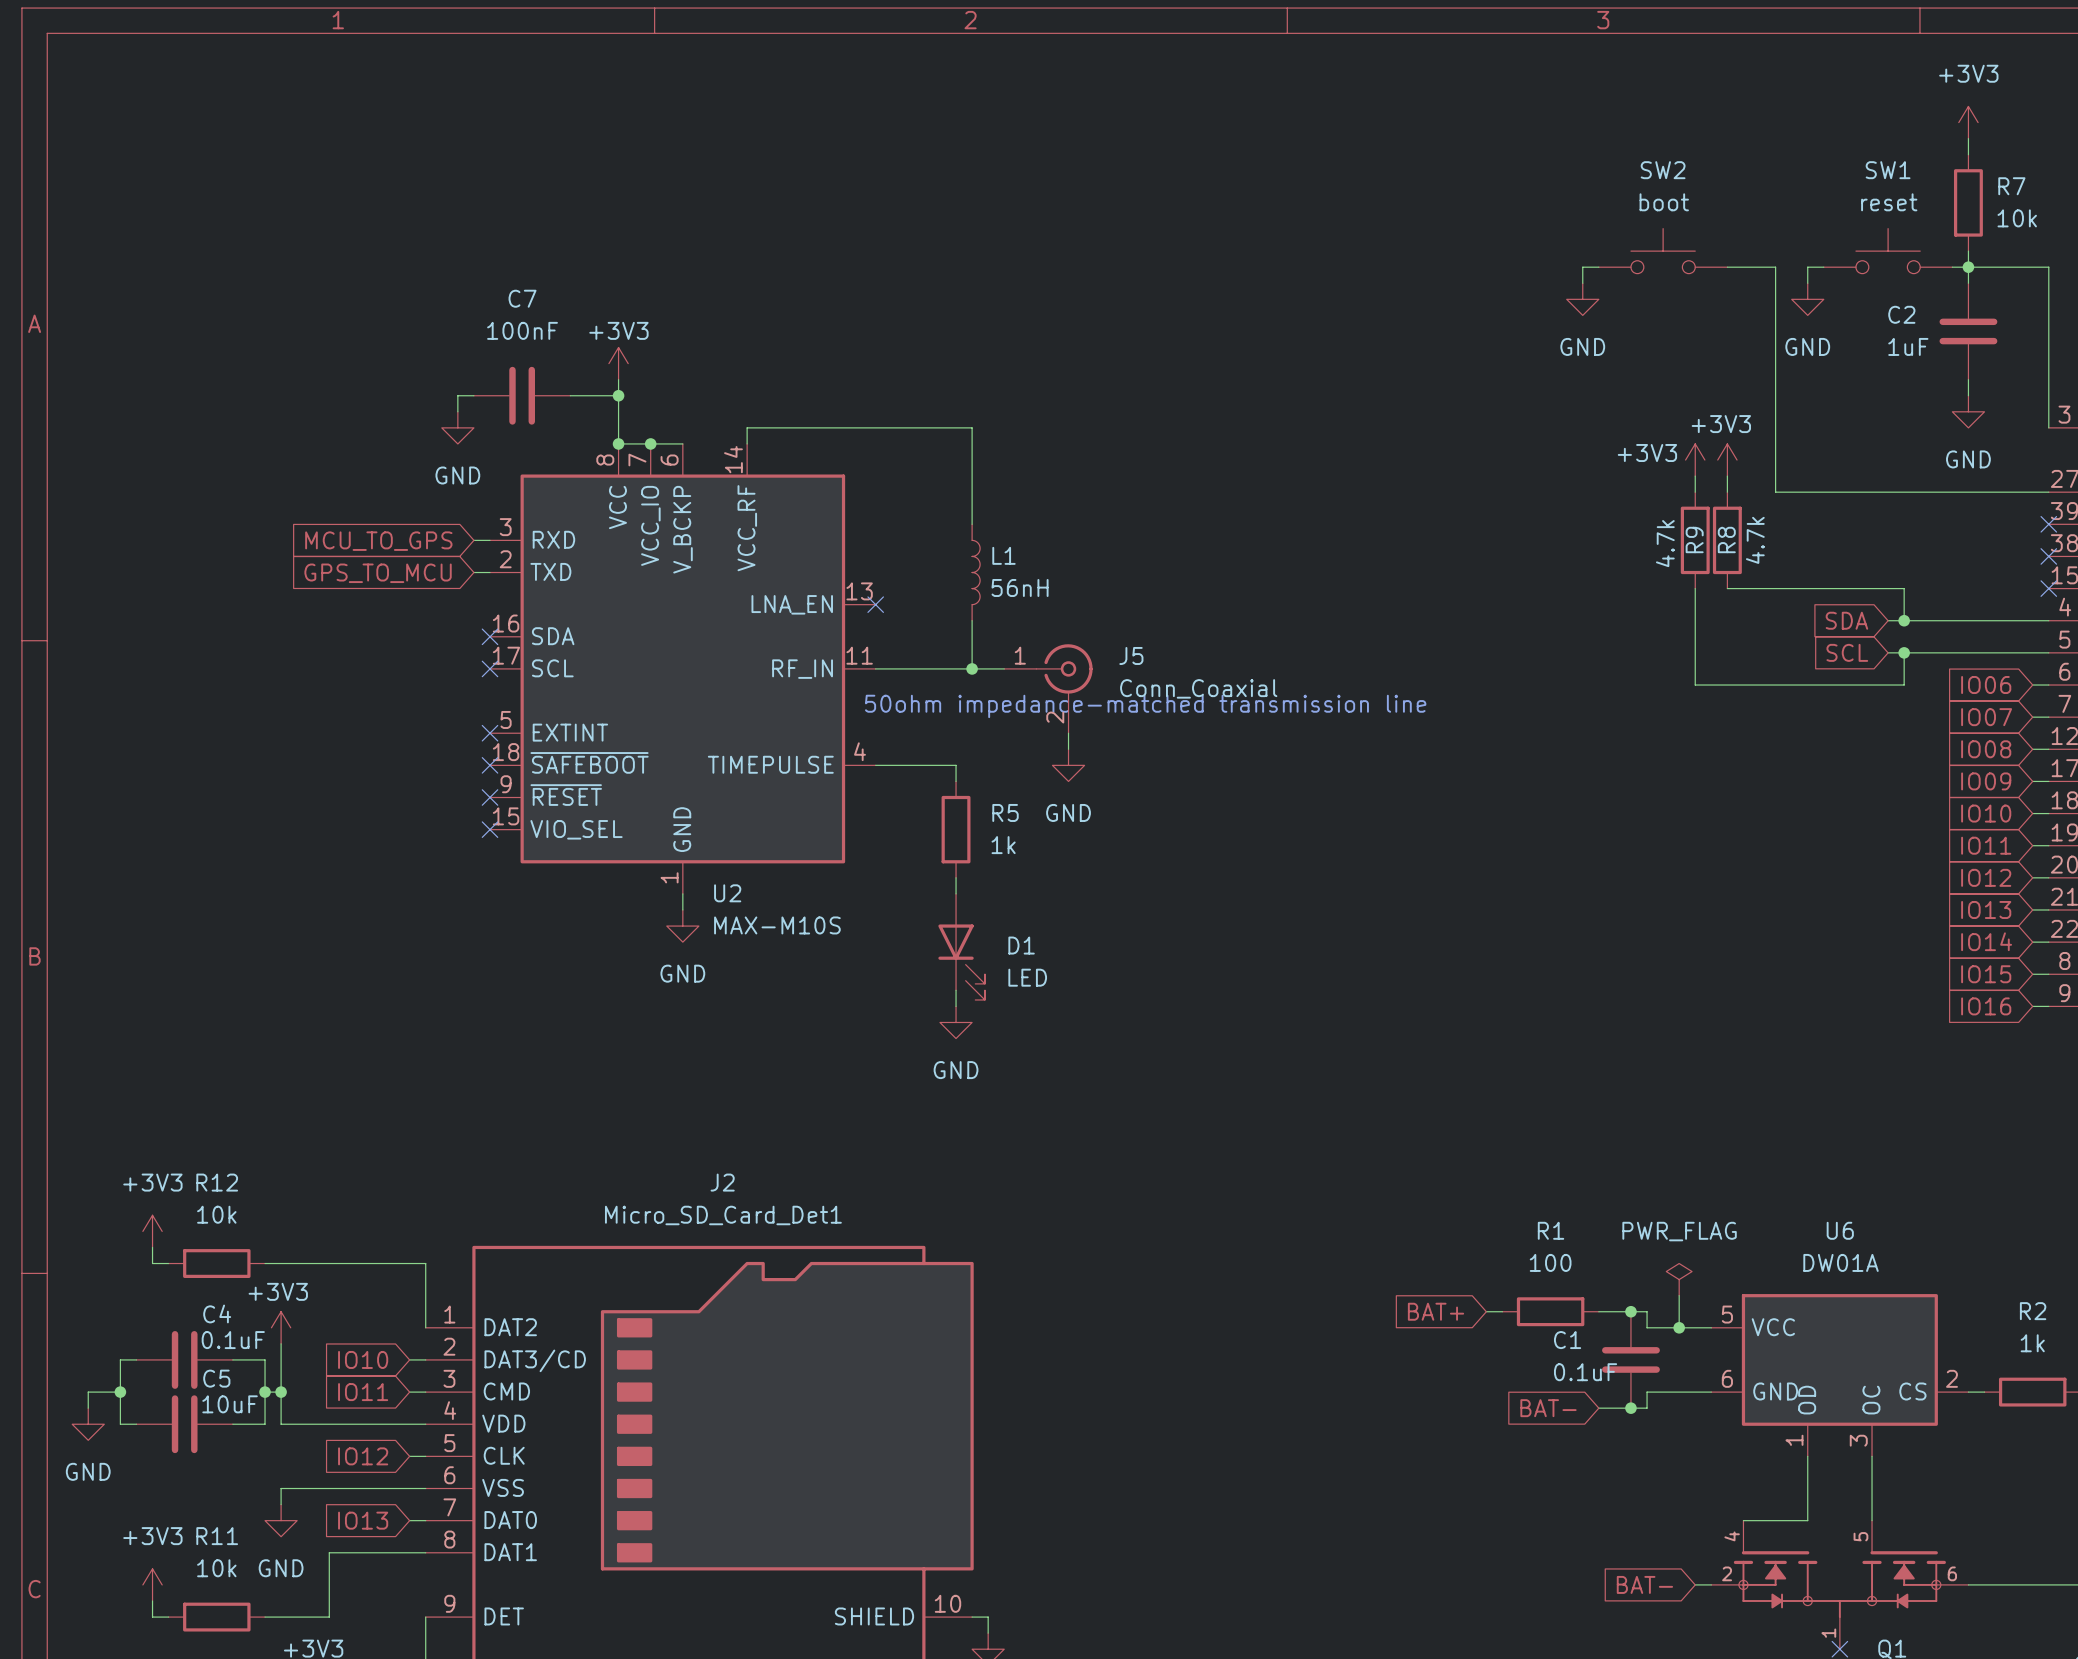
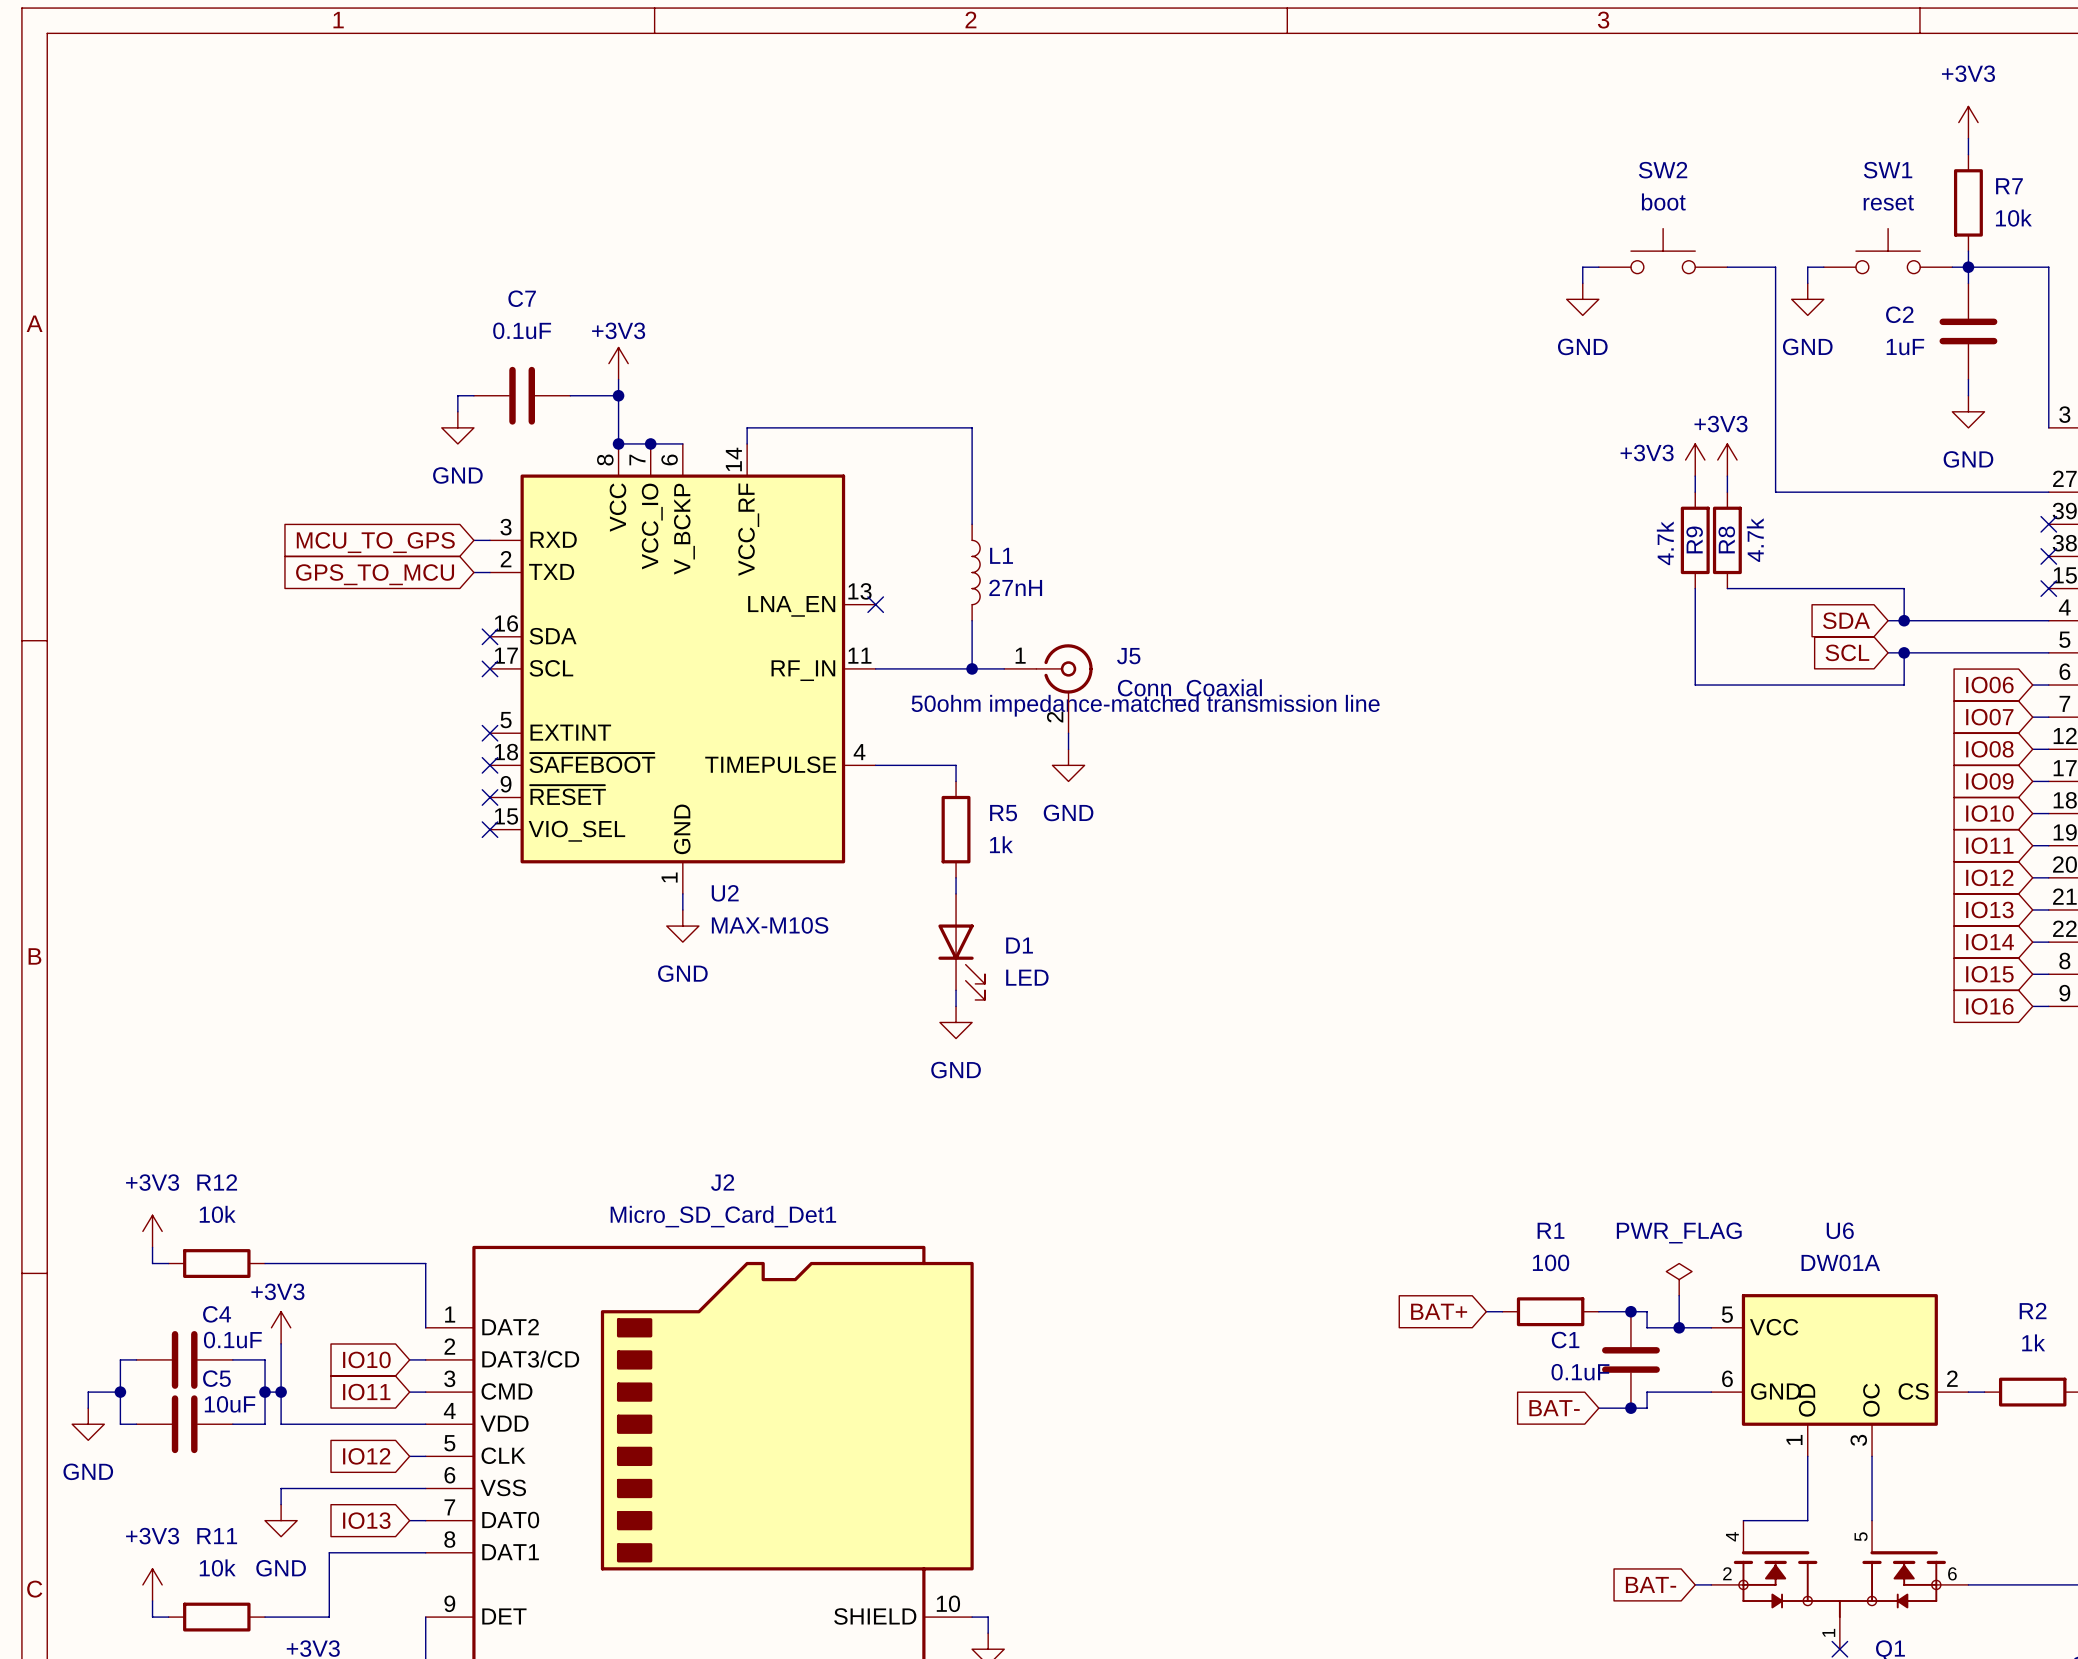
C7 value: 100nF (522, 330) -> 0.1uF (522, 330)
L1 value: 56nH (1020, 587) -> 27nH (1015, 587)

